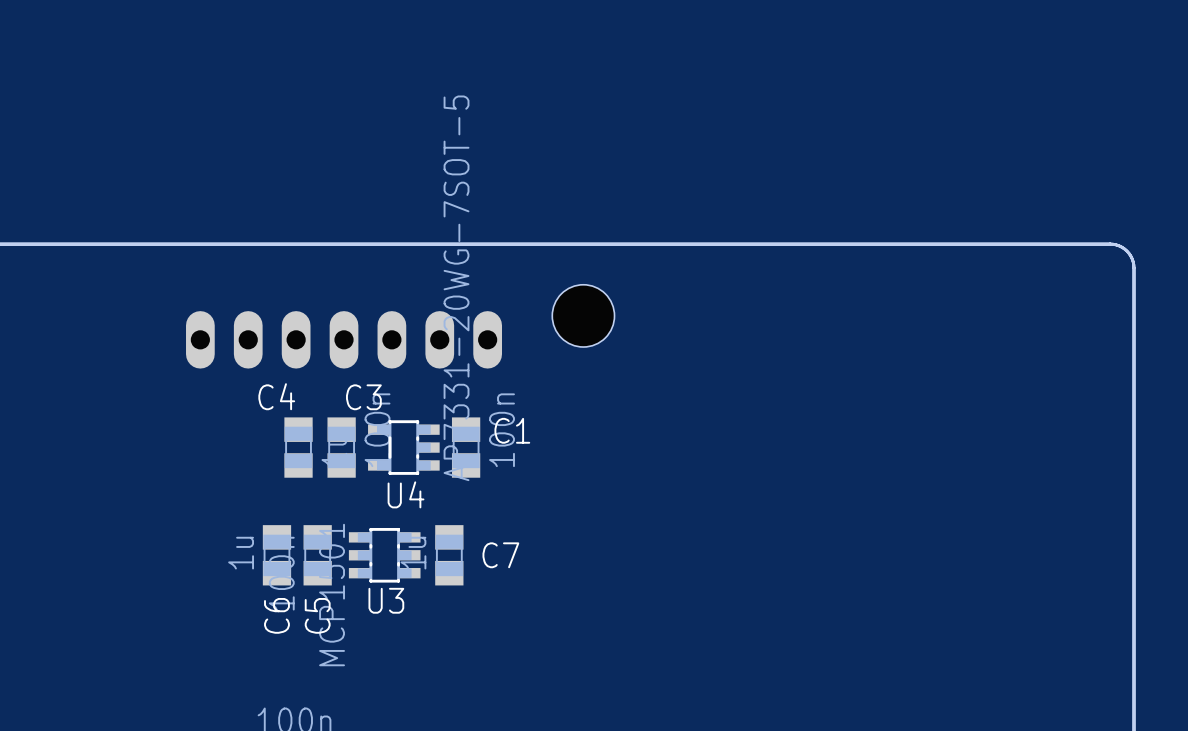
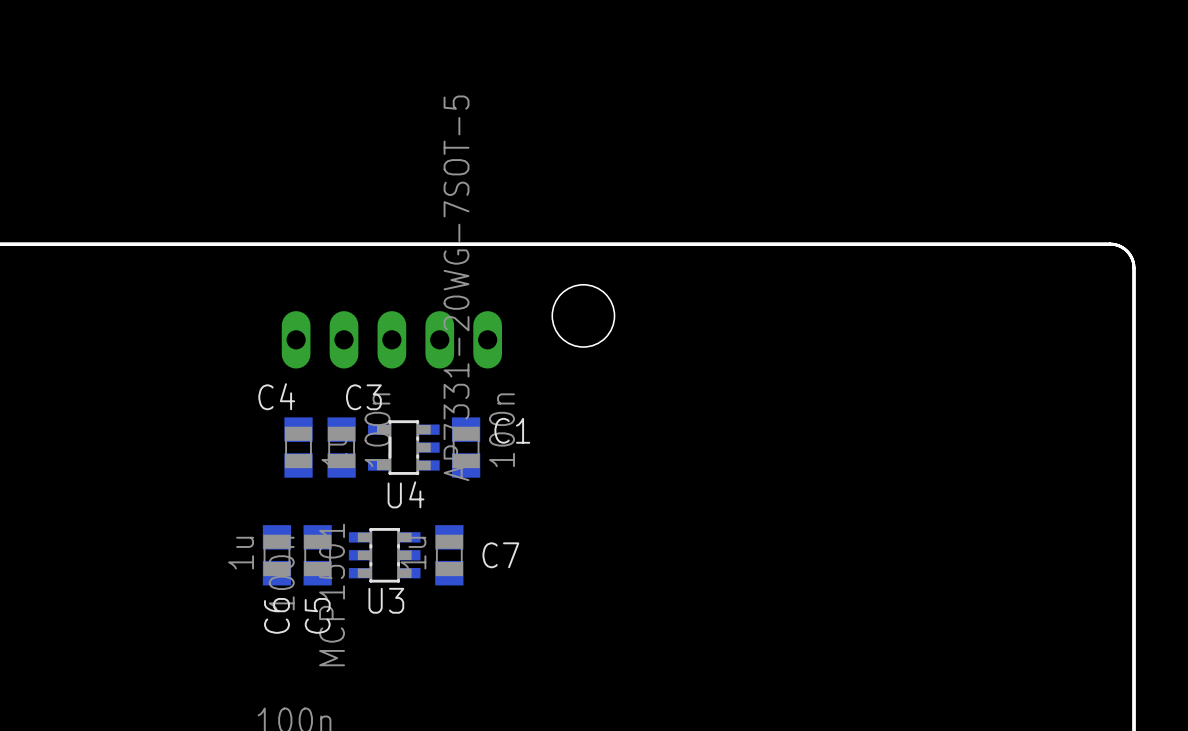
part: (344, 339) -> none

